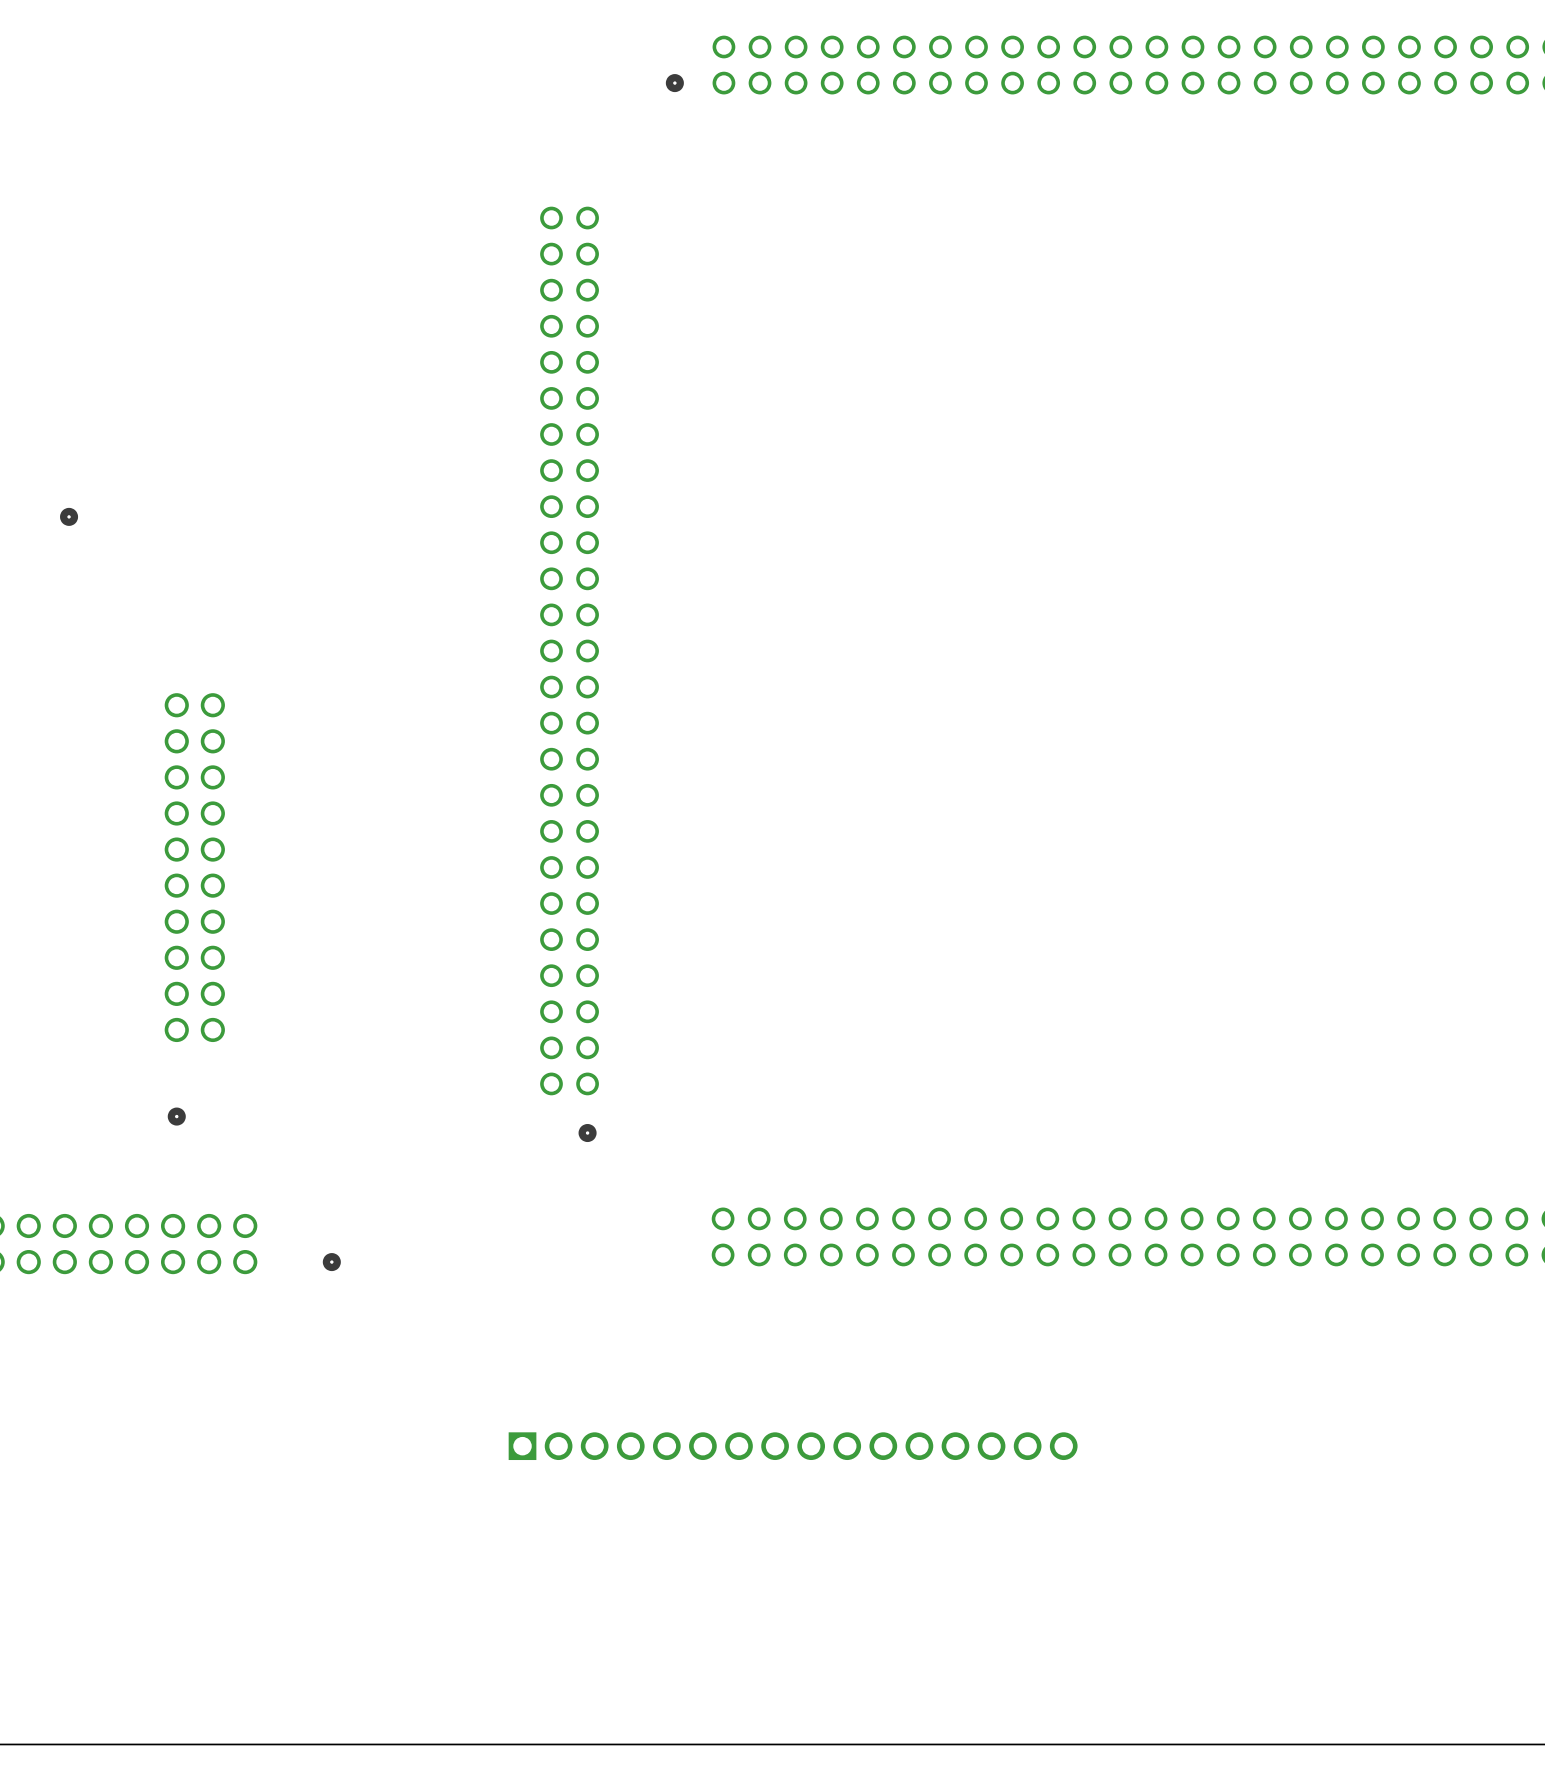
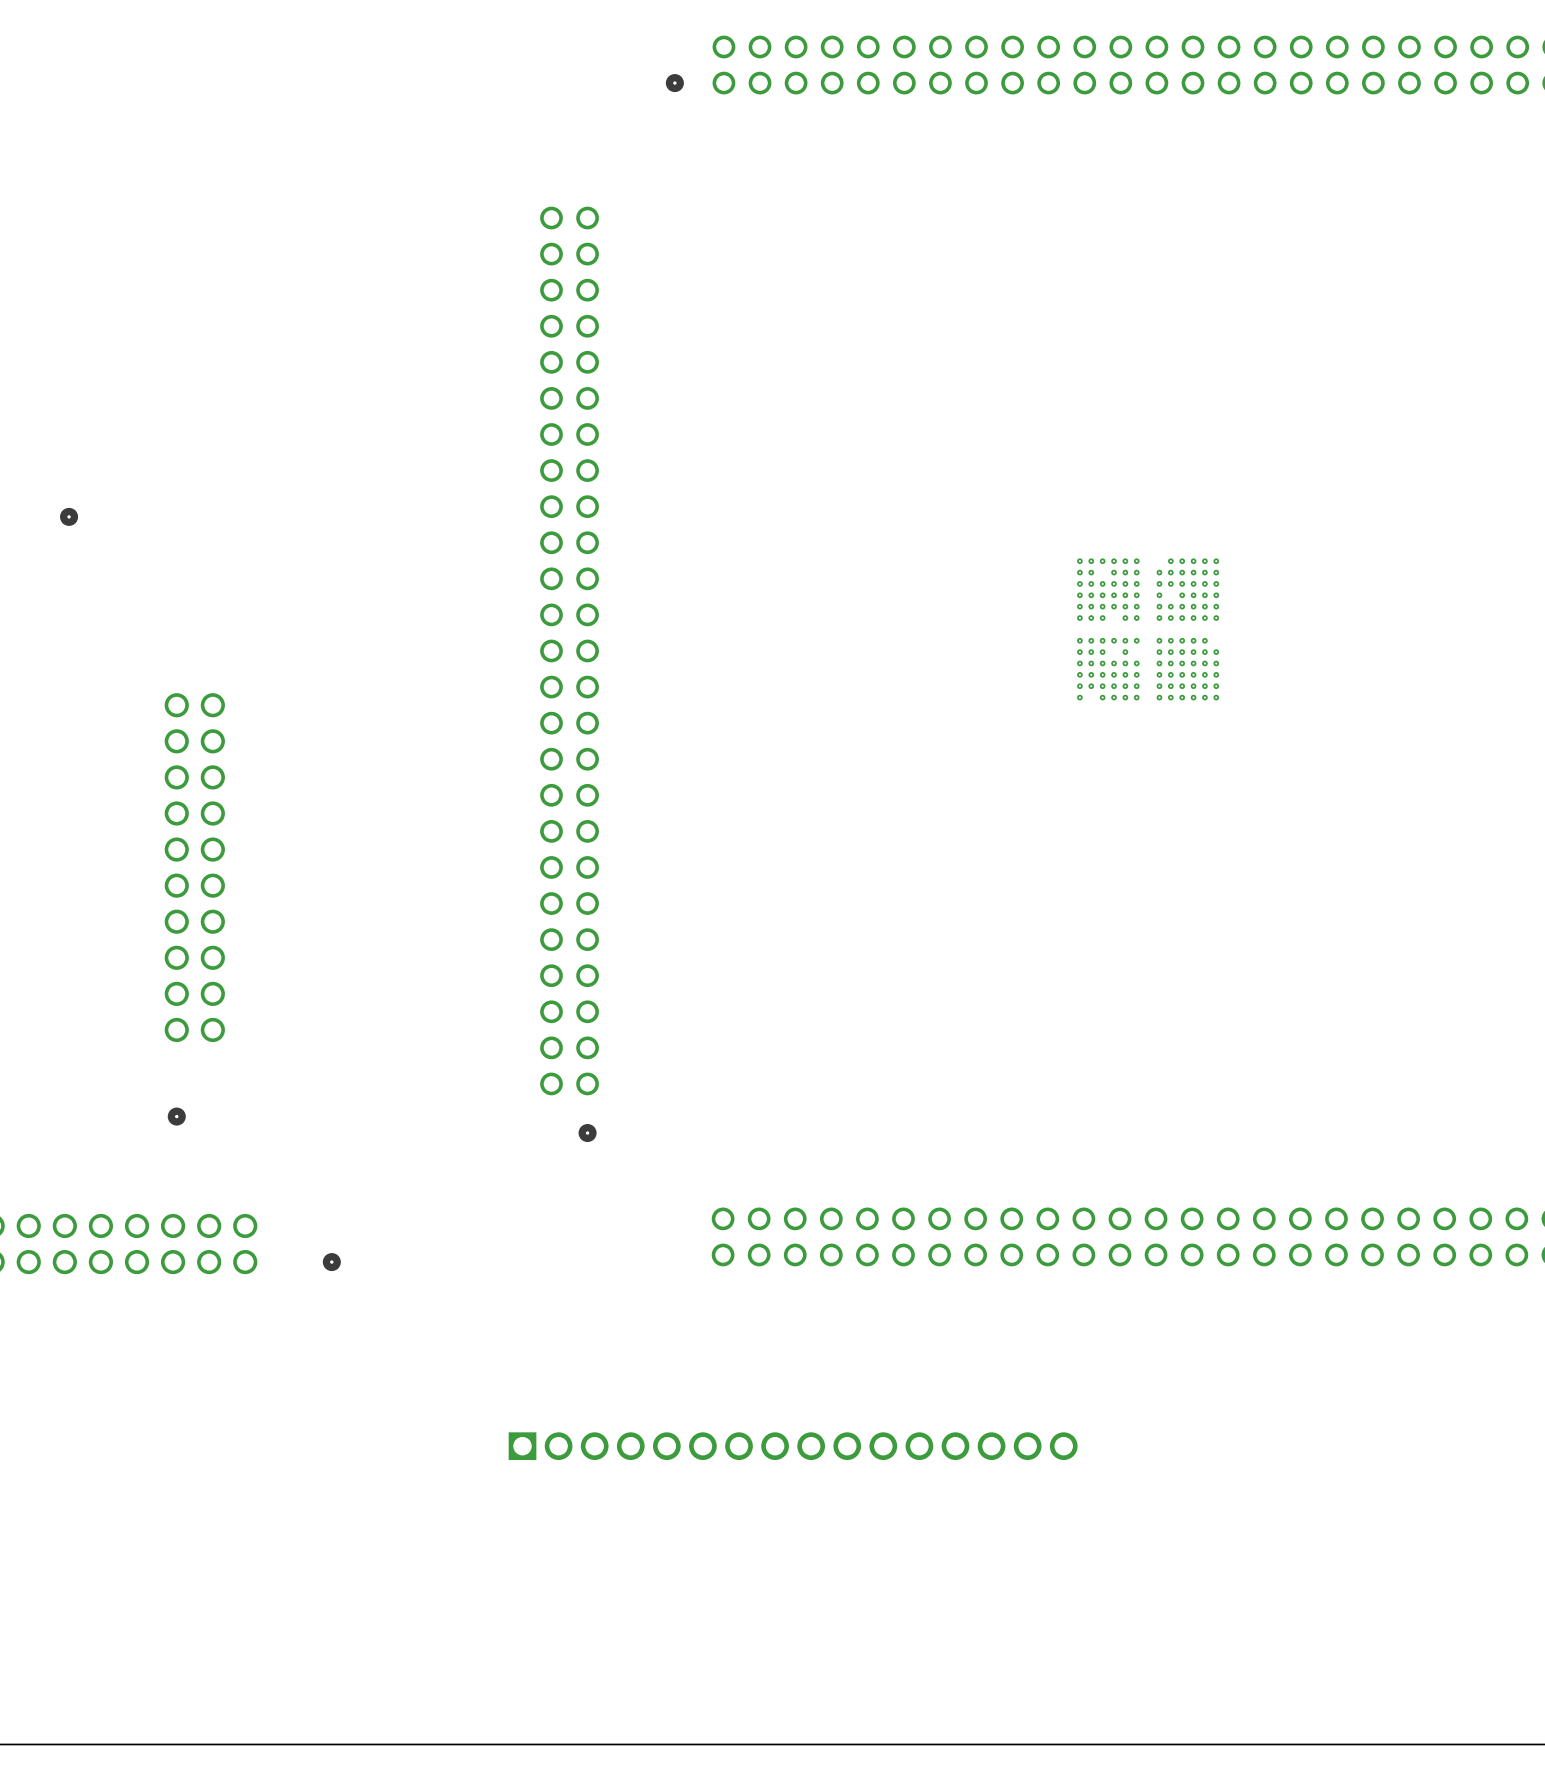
via: none -> (1079, 561)
via: none -> (1091, 561)
via: none -> (1102, 561)
via: none -> (1114, 561)
via: none -> (1125, 561)
via: none -> (1136, 561)
via: none -> (1170, 561)
via: none -> (1182, 561)
via: none -> (1193, 561)
via: none -> (1204, 561)
via: none -> (1216, 561)
via: none -> (1079, 572)
via: none -> (1091, 572)
via: none -> (1114, 572)
via: none -> (1125, 572)
via: none -> (1136, 572)
via: none -> (1159, 572)
via: none -> (1170, 572)
via: none -> (1182, 572)
via: none -> (1193, 572)
via: none -> (1204, 572)
via: none -> (1216, 572)
via: none -> (1079, 583)
via: none -> (1091, 583)
via: none -> (1102, 583)
via: none -> (1114, 583)
via: none -> (1125, 583)
via: none -> (1136, 583)
via: none -> (1159, 583)
via: none -> (1170, 583)
via: none -> (1182, 583)
via: none -> (1193, 583)
via: none -> (1204, 583)
via: none -> (1216, 583)
via: none -> (1079, 595)
via: none -> (1091, 595)
via: none -> (1102, 595)
via: none -> (1114, 595)
via: none -> (1125, 595)
via: none -> (1136, 595)
via: none -> (1159, 595)
via: none -> (1182, 595)
via: none -> (1193, 595)
via: none -> (1204, 595)
via: none -> (1216, 595)
via: none -> (1079, 606)
via: none -> (1091, 606)
via: none -> (1102, 606)
via: none -> (1114, 606)
via: none -> (1125, 606)
via: none -> (1136, 606)
via: none -> (1159, 606)
via: none -> (1170, 606)
via: none -> (1182, 606)
via: none -> (1193, 606)
via: none -> (1204, 606)
via: none -> (1216, 606)
via: none -> (1079, 618)
via: none -> (1091, 618)
via: none -> (1102, 618)
via: none -> (1125, 618)
via: none -> (1136, 618)
via: none -> (1159, 618)
via: none -> (1170, 618)
via: none -> (1182, 618)
via: none -> (1193, 618)
via: none -> (1204, 618)
via: none -> (1216, 618)
via: none -> (1079, 640)
via: none -> (1091, 640)
via: none -> (1102, 640)
via: none -> (1114, 640)
via: none -> (1125, 640)
via: none -> (1136, 640)
via: none -> (1159, 640)
via: none -> (1170, 640)
via: none -> (1182, 640)
via: none -> (1193, 640)
via: none -> (1204, 640)
via: none -> (1079, 652)
via: none -> (1091, 652)
via: none -> (1102, 652)
via: none -> (1125, 652)
via: none -> (1159, 652)
via: none -> (1170, 652)
via: none -> (1182, 652)
via: none -> (1193, 652)
via: none -> (1204, 652)
via: none -> (1216, 652)
via: none -> (1079, 663)
via: none -> (1091, 663)
via: none -> (1102, 663)
via: none -> (1114, 663)
via: none -> (1125, 663)
via: none -> (1136, 663)
via: none -> (1159, 663)
via: none -> (1170, 663)
via: none -> (1182, 663)
via: none -> (1193, 663)
via: none -> (1204, 663)
via: none -> (1216, 663)
via: none -> (1079, 674)
via: none -> (1091, 674)
via: none -> (1102, 674)
via: none -> (1114, 674)
via: none -> (1125, 674)
via: none -> (1136, 674)
via: none -> (1159, 674)
via: none -> (1170, 674)
via: none -> (1182, 674)
via: none -> (1193, 674)
via: none -> (1204, 674)
via: none -> (1216, 674)
via: none -> (1079, 686)
via: none -> (1091, 686)
via: none -> (1102, 686)
via: none -> (1114, 686)
via: none -> (1125, 686)
via: none -> (1136, 686)
via: none -> (1159, 686)
via: none -> (1170, 686)
via: none -> (1182, 686)
via: none -> (1193, 686)
via: none -> (1204, 686)
via: none -> (1216, 686)
via: none -> (1079, 697)
via: none -> (1102, 697)
via: none -> (1114, 697)
via: none -> (1125, 697)
via: none -> (1136, 697)
via: none -> (1159, 697)
via: none -> (1170, 697)
via: none -> (1182, 697)
via: none -> (1193, 697)
via: none -> (1204, 697)
via: none -> (1216, 697)

